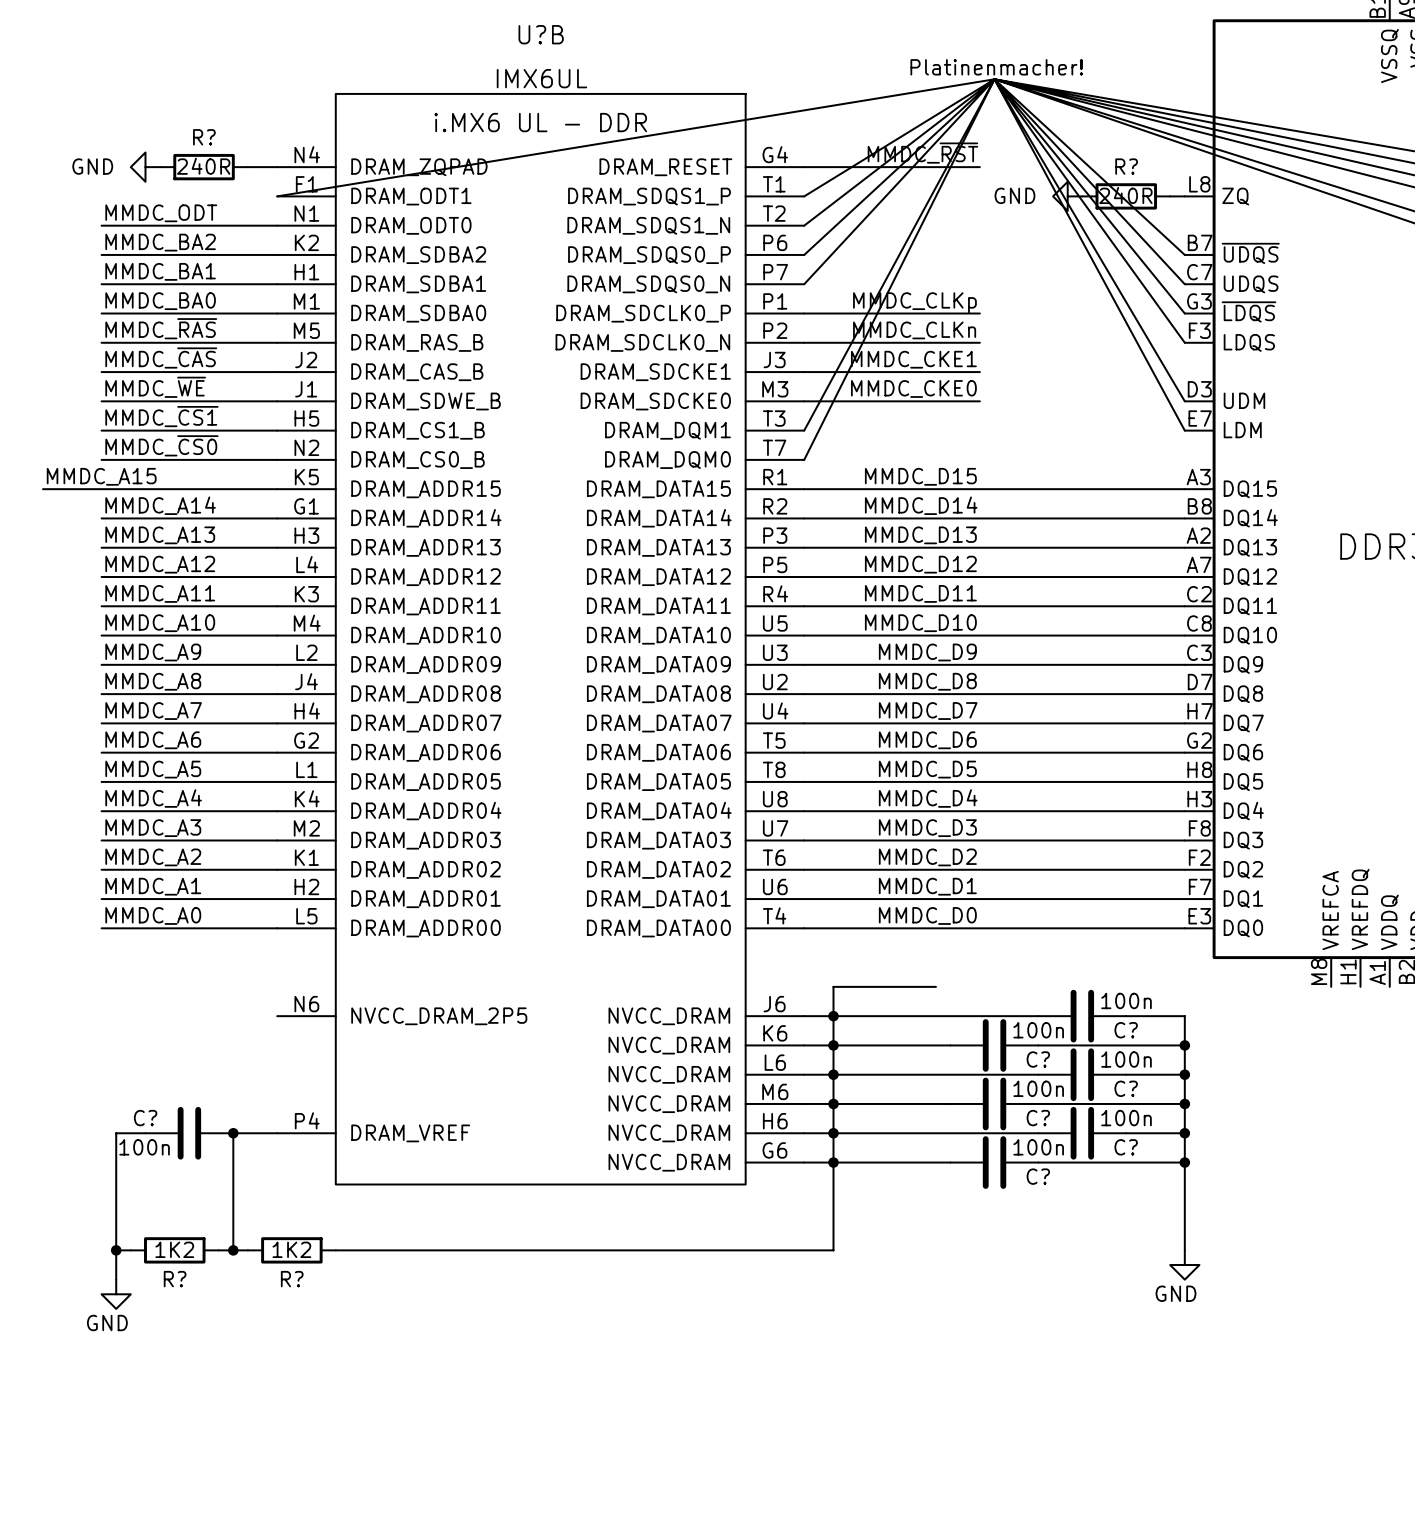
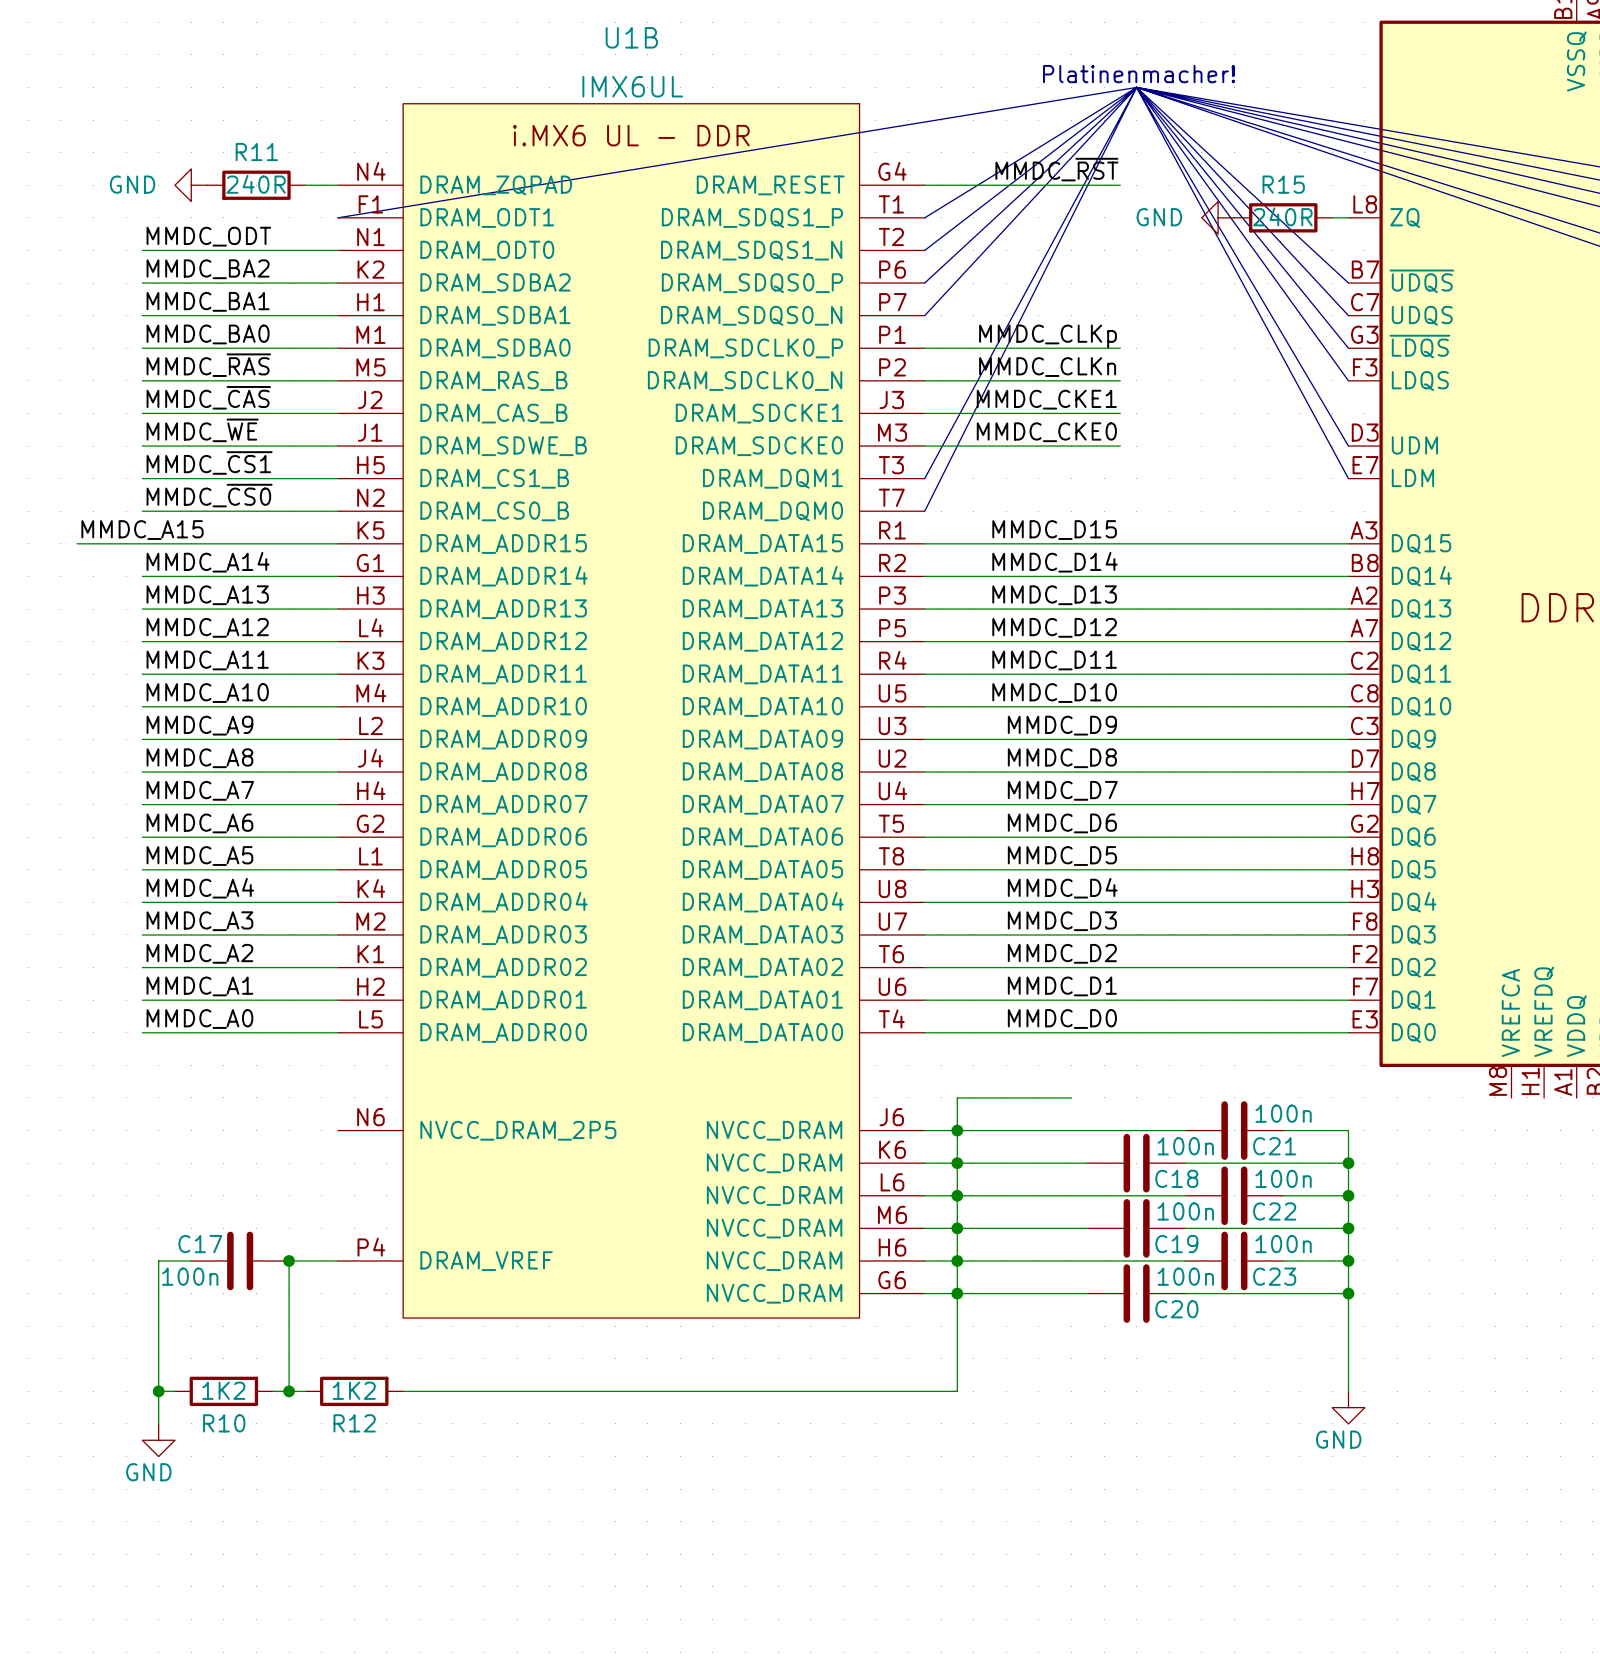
U?B name: U?B (541, 34) -> U1B (631, 37)
R? name: R? (204, 137) -> R11 (256, 152)
R? name: R? (1126, 166) -> R15 (1283, 184)
C? name: C? (1126, 1030) -> C21 (1274, 1146)
C? name: C? (1038, 1059) -> C18 (1176, 1178)
C? name: C? (1126, 1088) -> C22 (1274, 1211)
C? name: C? (145, 1118) -> C17 (200, 1244)
C? name: C? (1038, 1118) -> C19 (1176, 1244)
C? name: C? (1126, 1147) -> C23 (1274, 1276)
C? name: C? (1038, 1176) -> C20 (1176, 1309)
R? name: R? (175, 1279) -> R10 (224, 1423)
R? name: R? (292, 1279) -> R12 (354, 1423)

